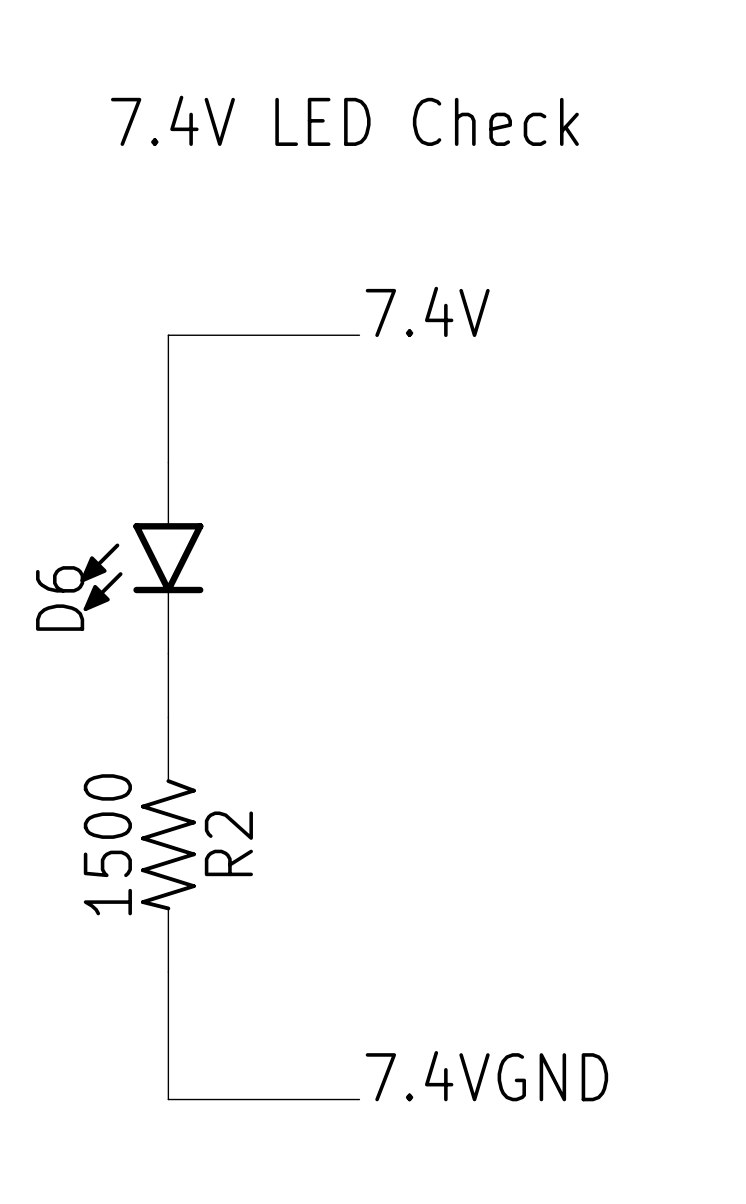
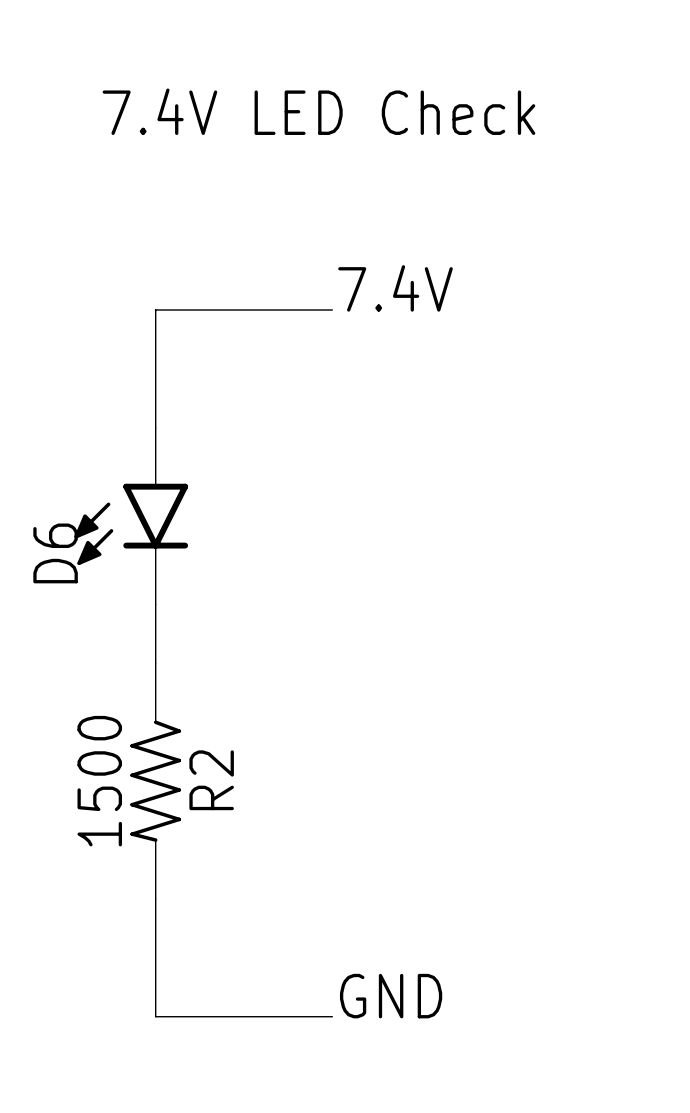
label: 7.4VGND (486, 1076) -> GND (391, 996)

